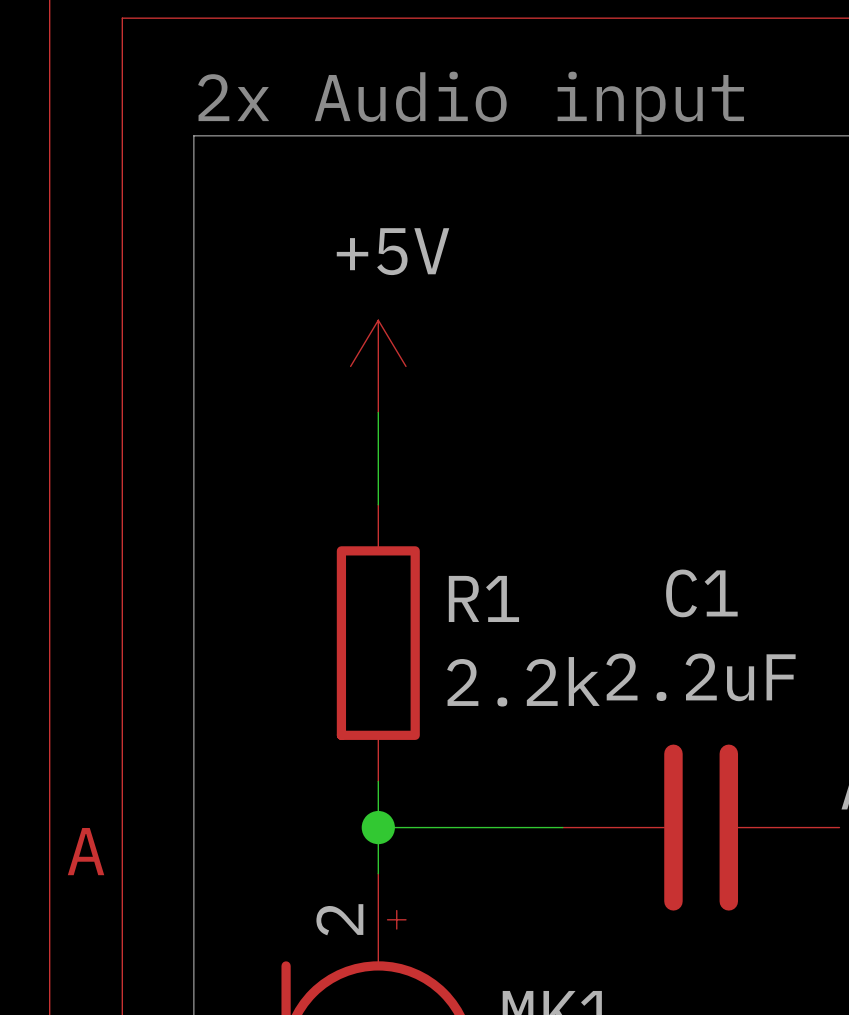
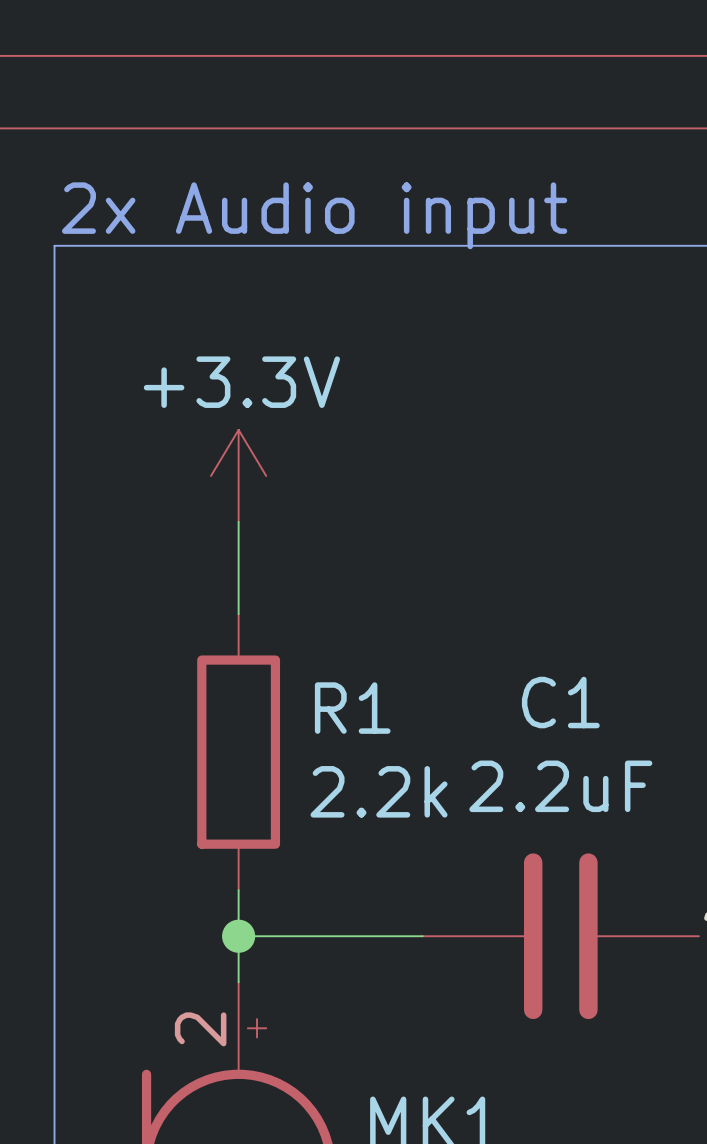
power symbol: +5V (378, 366) -> +3.3V (238, 475)

